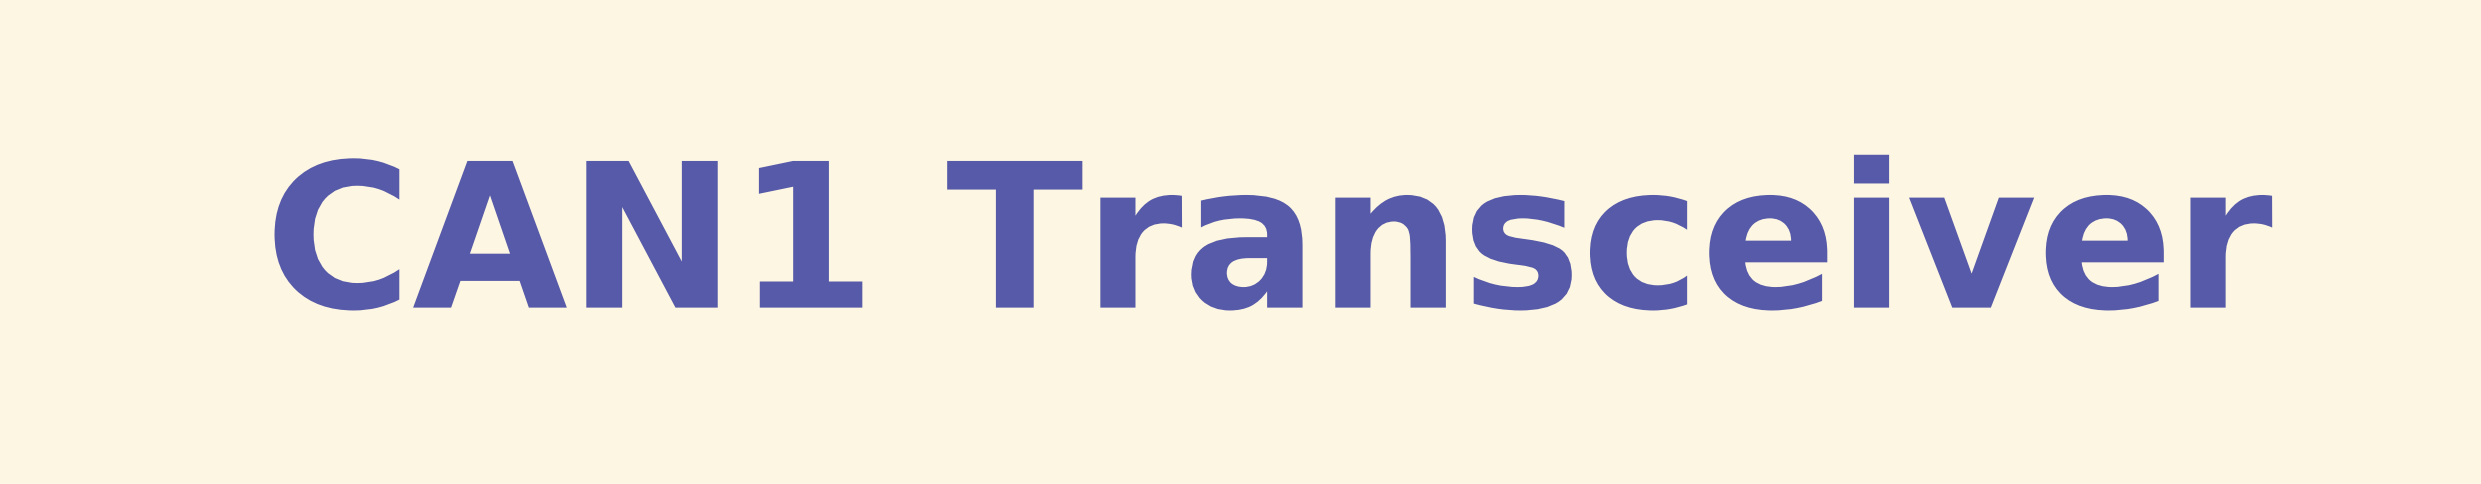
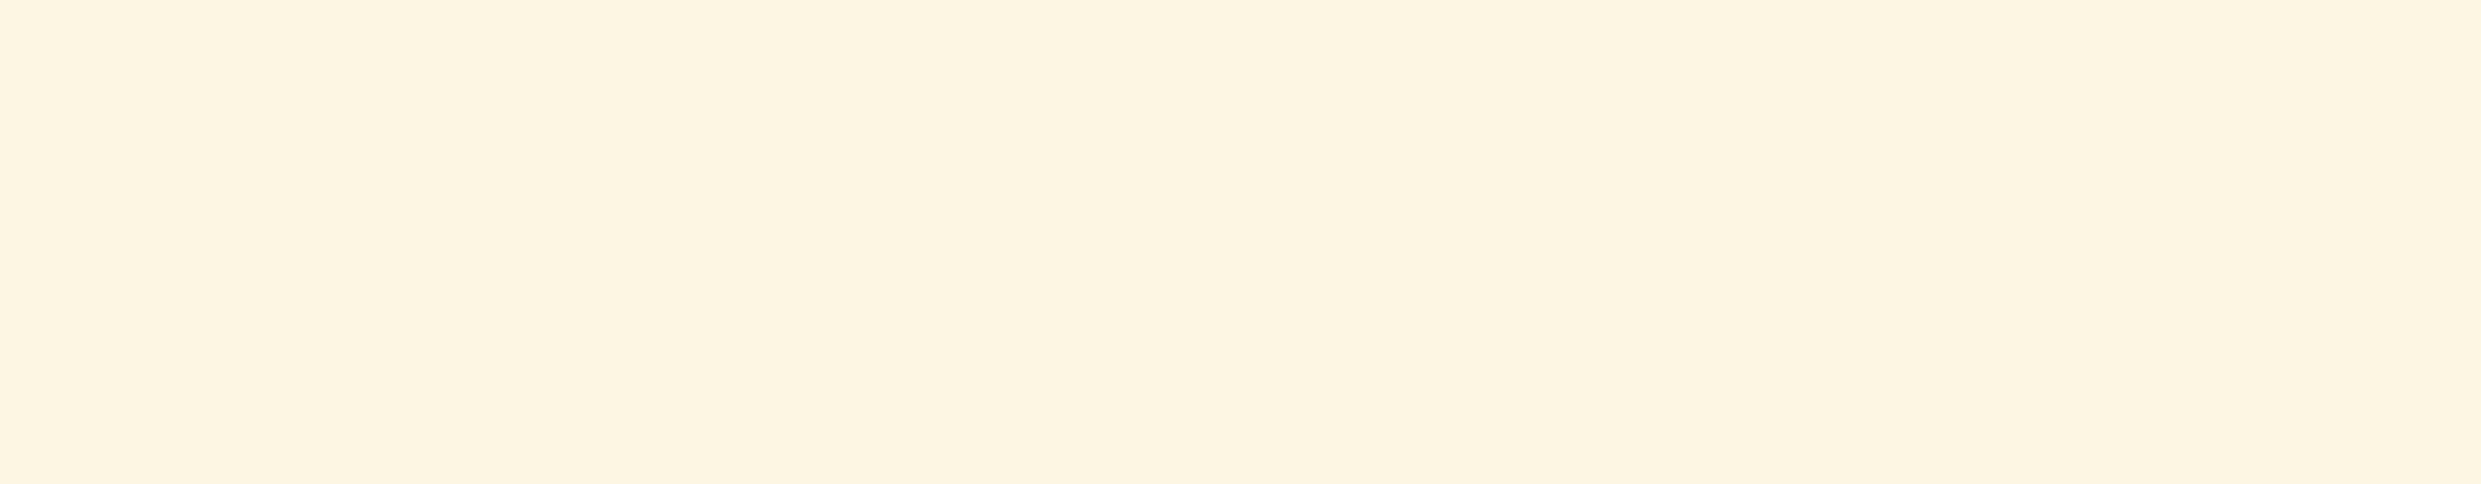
text: CAN1 Transceiver (1273, 232) -> none

